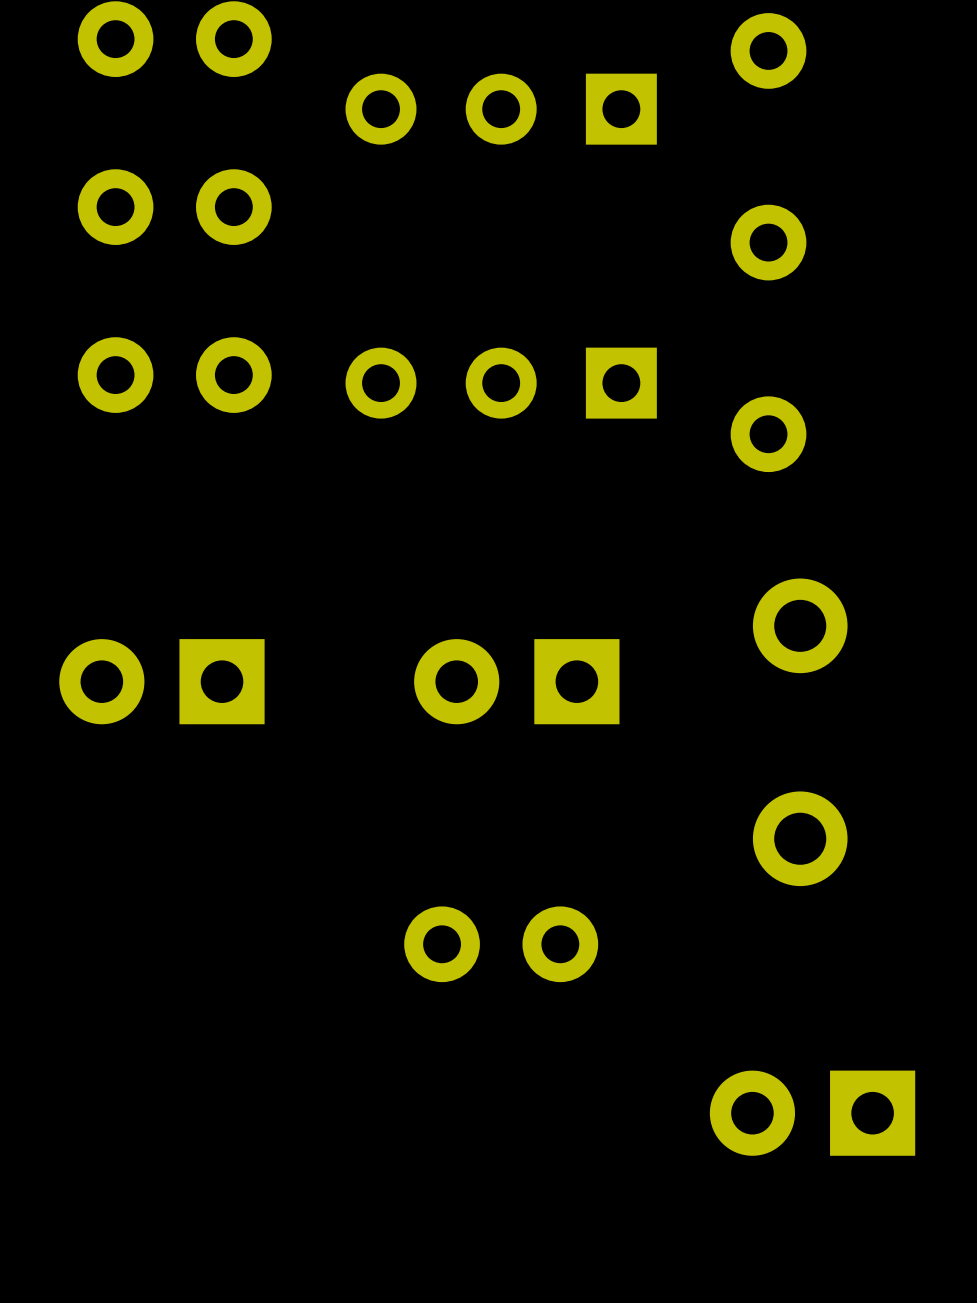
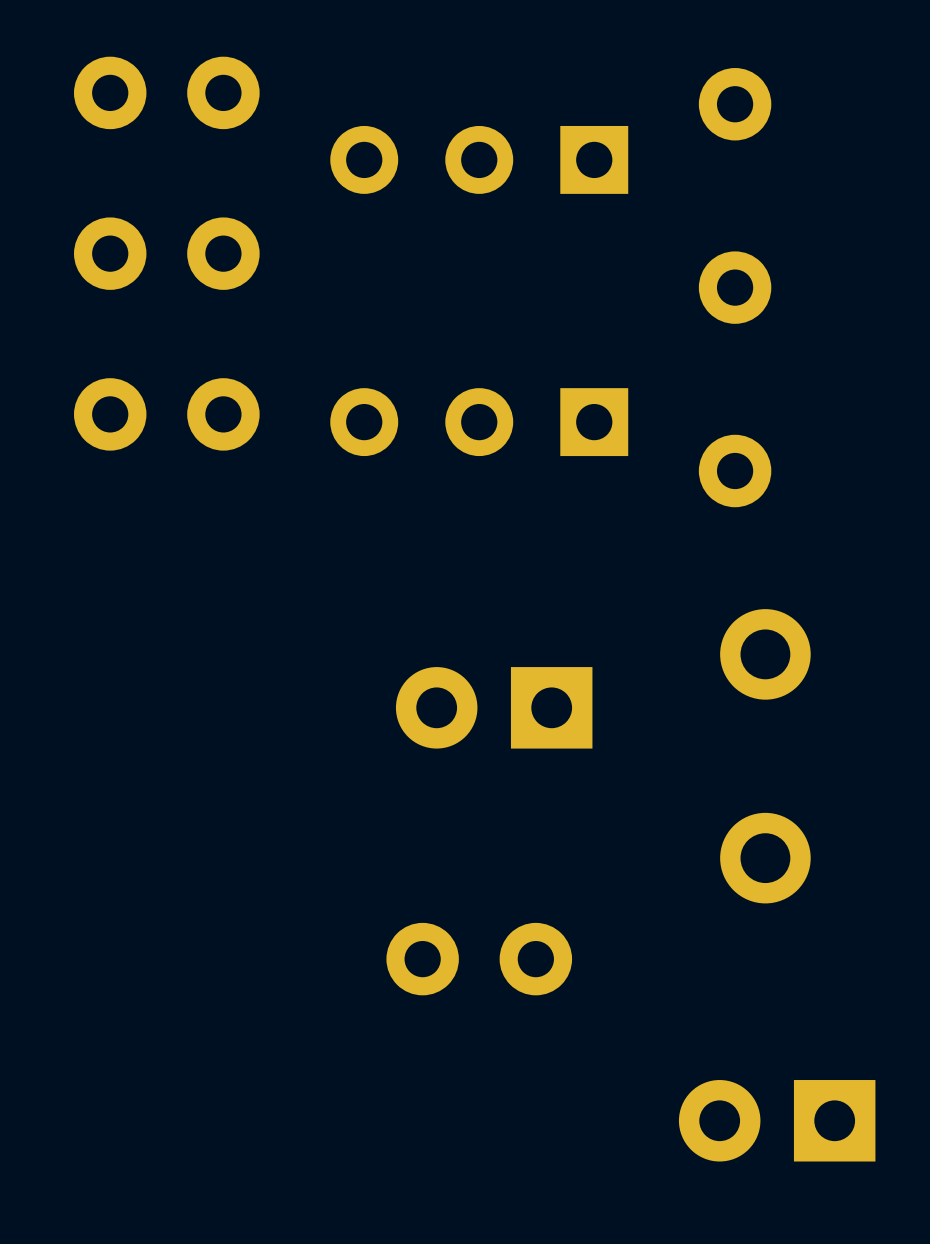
part: (161, 681) -> none

